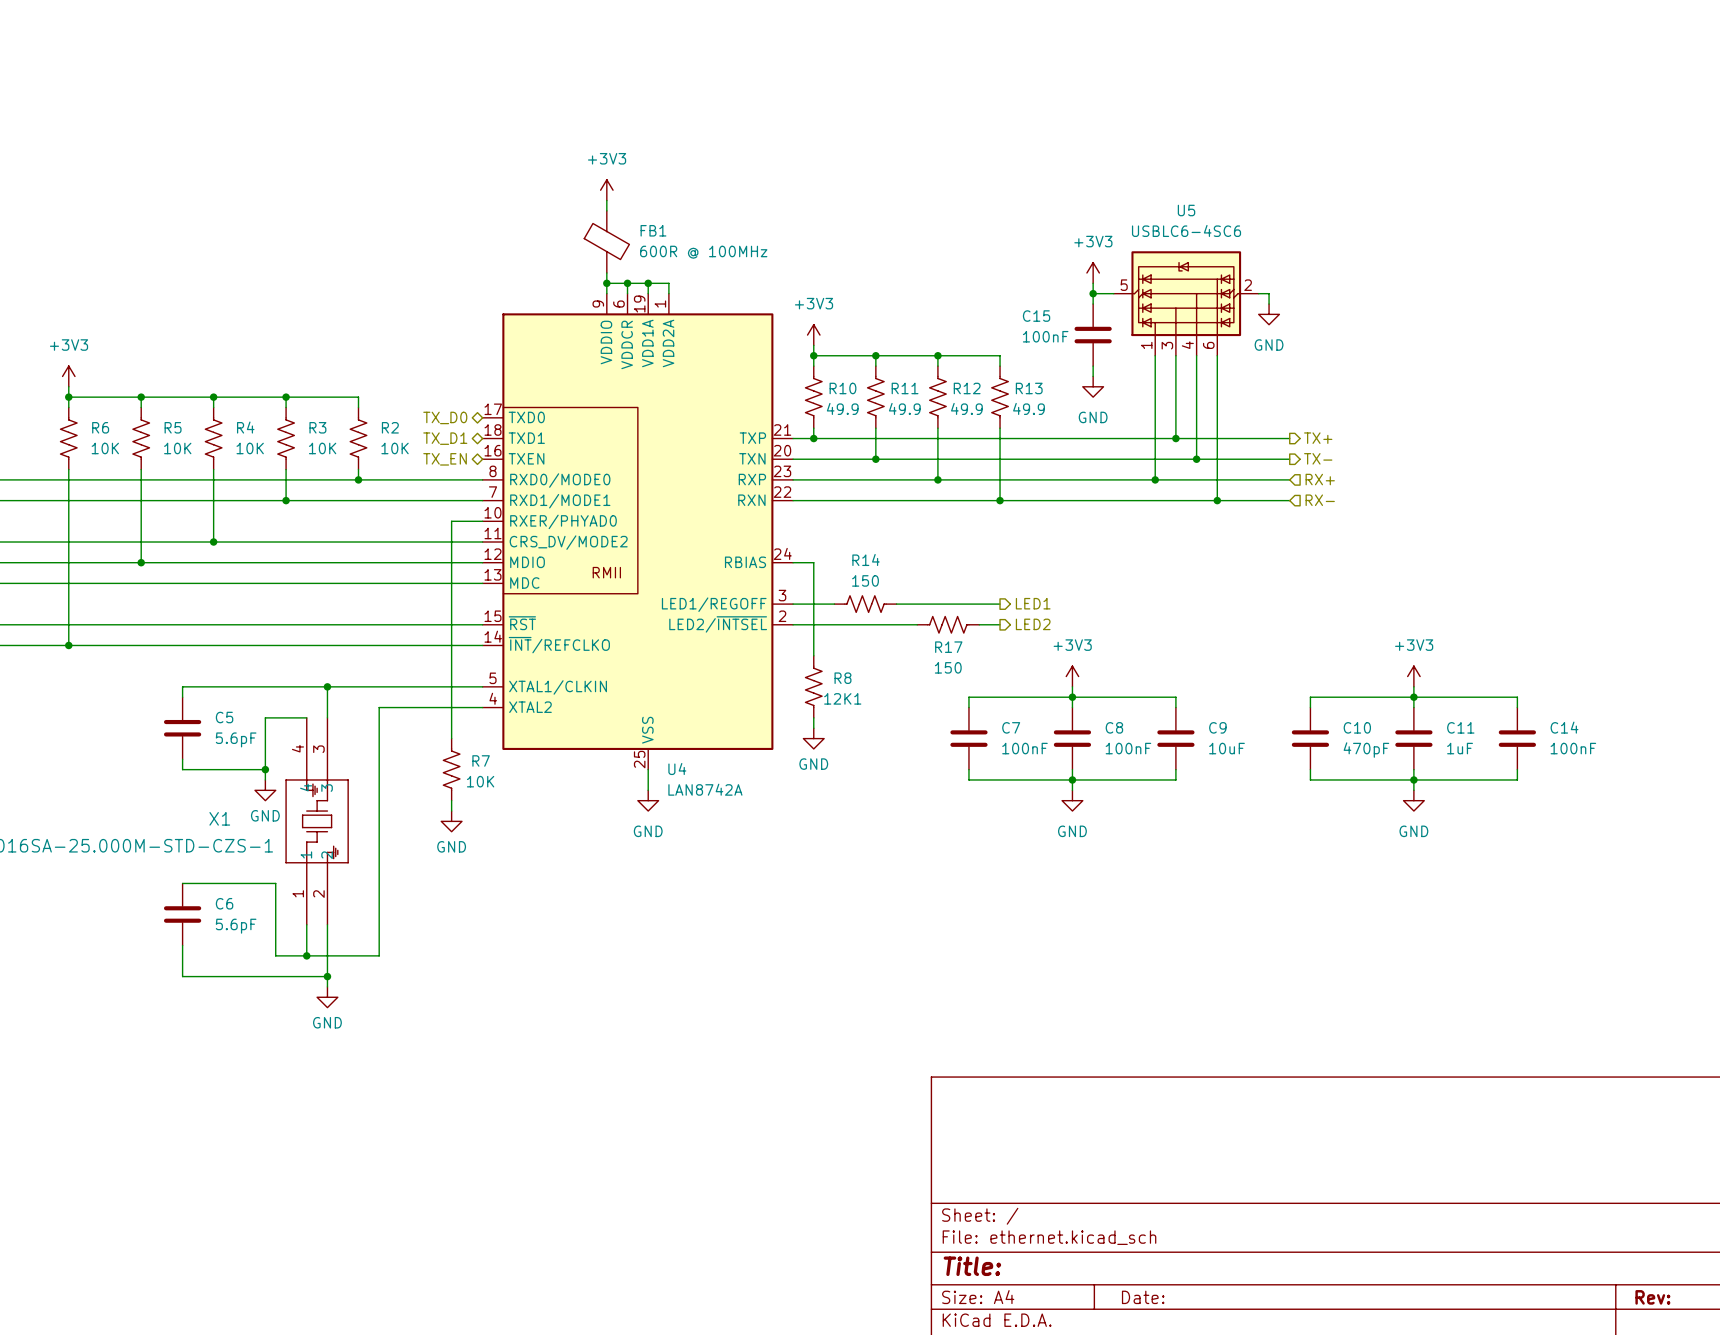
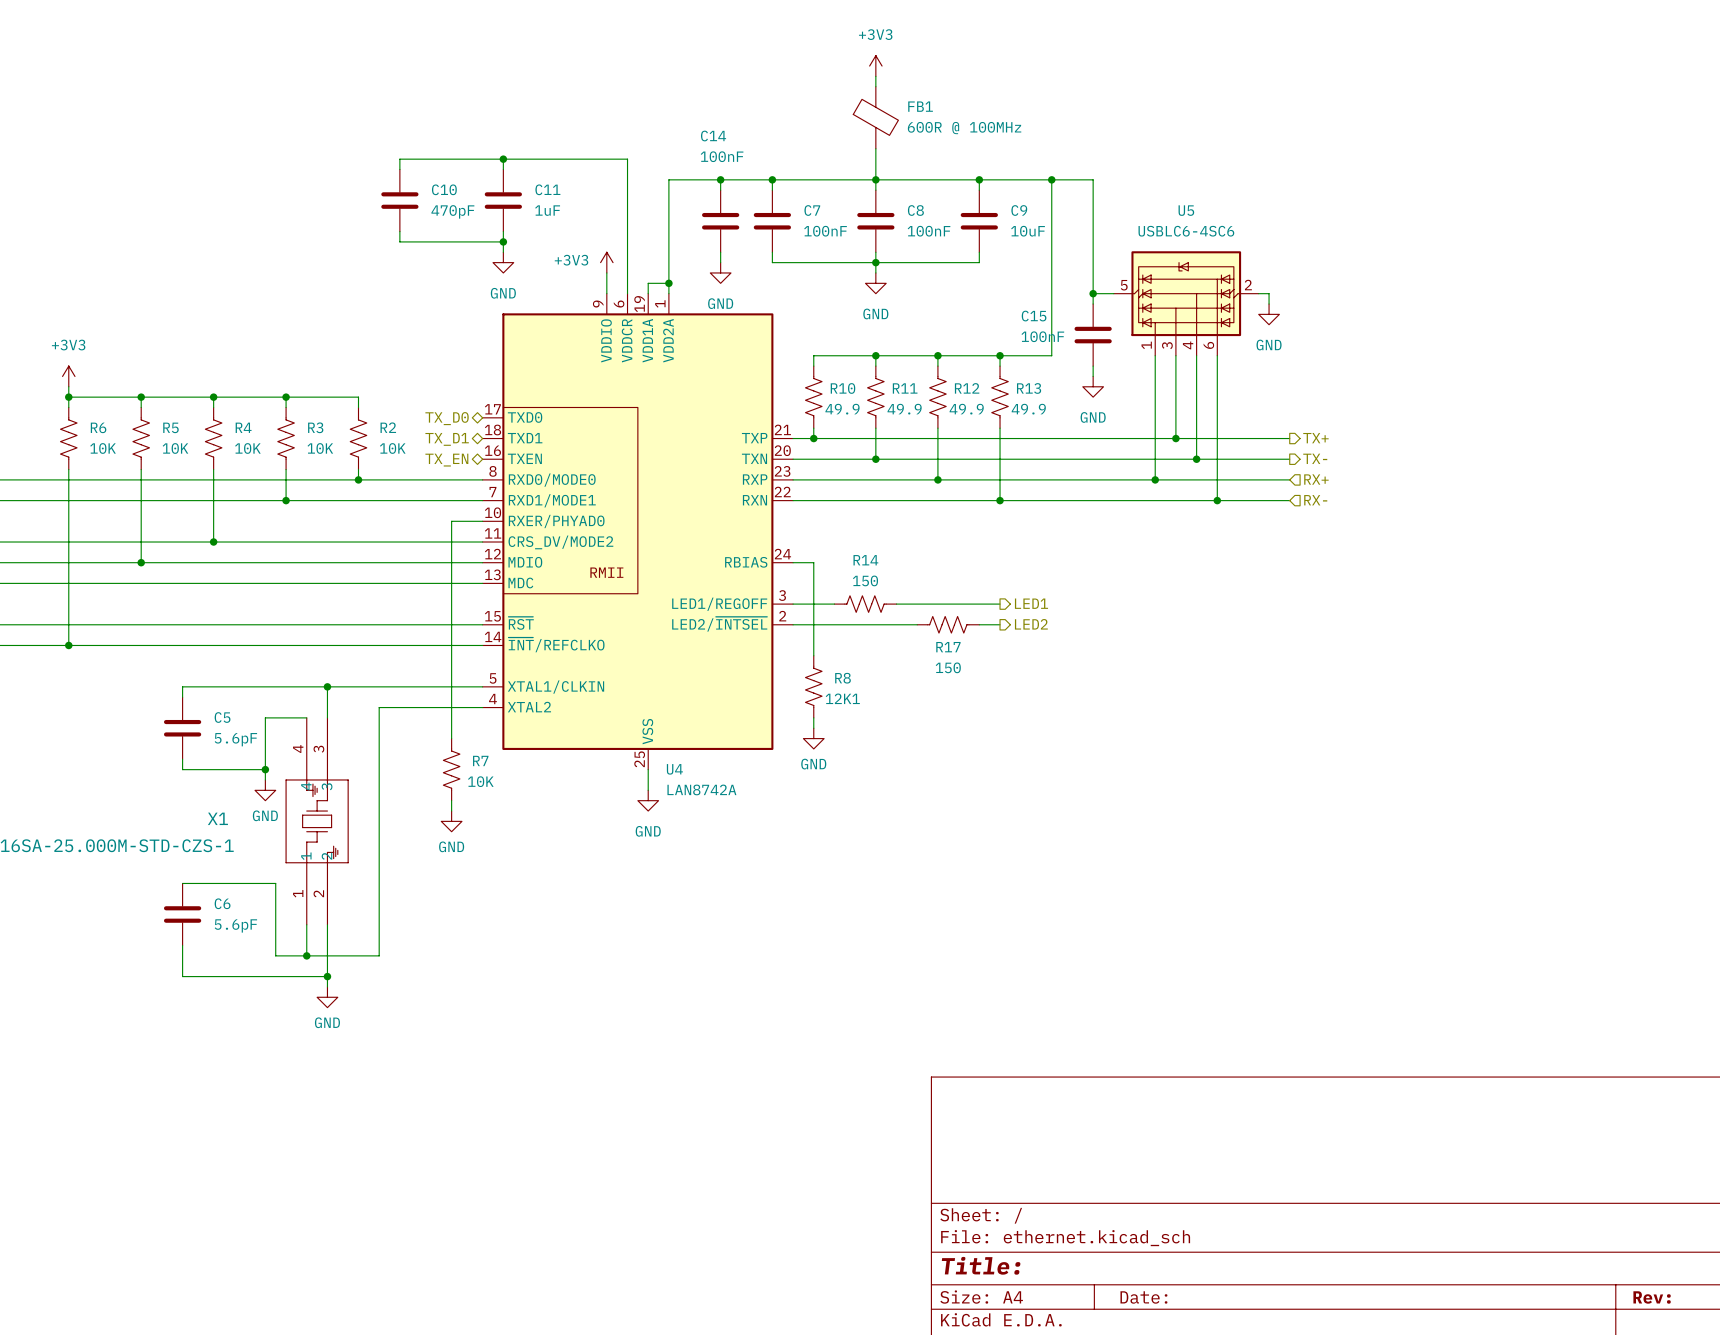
power symbol: none -> +3V3 (875, 66)
wire: none -> (875, 76) (875, 86)
wire: none -> (875, 148) (875, 190)
power symbol text position: +3V3 (607, 158) -> +3V3 (571, 260)
junction: none -> (503, 159)
wire: none -> (399, 169) (399, 159) (627, 159) (627, 283)
wire: none -> (720, 179) (720, 190)
junction: none -> (720, 179)
wire: none -> (772, 179) (772, 190)
junction: none -> (772, 179)
junction: none -> (875, 179)
wire: none -> (979, 179) (979, 190)
junction: none -> (979, 179)
wire: none -> (1051, 179) (1051, 355) (1000, 355)
junction: none -> (1051, 179)
power symbol position: +3V3 (606, 190) -> +3V3 (606, 262)
wire: (606, 200) (606, 210) -> (503, 159) (503, 169)
wire: none -> (399, 231) (399, 241) (503, 241)
wire: none -> (503, 231) (503, 252)
junction: none -> (503, 241)
FB1 position: (606, 241) -> (875, 117)
wire: none -> (772, 252) (772, 262) (979, 262) (979, 252)
wire: none -> (875, 252) (875, 272)
power symbol: none -> GND (503, 262)
junction: none -> (875, 262)
power symbol: none -> GND (720, 272)
power symbol: +3V3 (1093, 272) -> none
wire: (606, 283) (648, 283) -> none
junction: (606, 283) -> none
junction: (627, 283) -> none
junction: (648, 283) -> none
wire: none -> (668, 283) (668, 179) (1093, 179) (1093, 283)
junction: none -> (668, 283)
power symbol: none -> GND (875, 283)
power symbol: +3V3 (813, 335) -> none
wire: (813, 345) (813, 355) -> (720, 252) (720, 262)
junction: (813, 355) -> none
junction: none -> (1000, 355)
power symbol: +3V3 (1072, 676) -> none
power symbol: +3V3 (1413, 676) -> none
wire: (1072, 686) (1072, 707) -> none
wire: (1413, 686) (1413, 707) -> none
junction: (1072, 697) -> none
junction: (1413, 697) -> none
wire: (968, 707) (968, 697) (1175, 697) (1175, 707) -> none
wire: (1310, 707) (1310, 697) (1517, 697) (1517, 707) -> none
C14 name position: C14 (1564, 727) -> C14 (713, 136)
C7 position: (968, 738) -> (772, 221)
C8 position: (1072, 738) -> (875, 221)
C9 position: (1175, 738) -> (979, 221)
C10 position: (1310, 738) -> (399, 200)
C11 position: (1413, 738) -> (503, 200)
C14 position: (1517, 738) -> (720, 221)
C14 value position: 100nF (1573, 748) -> 100nF (722, 156)
wire: (968, 769) (968, 779) (1175, 779) (1175, 769) -> none
wire: (1072, 769) (1072, 790) -> none
wire: (1310, 769) (1310, 779) (1517, 779) (1517, 769) -> none
wire: (1413, 769) (1413, 790) -> none
junction: (1072, 779) -> none
junction: (1413, 779) -> none
power symbol: GND (1072, 800) -> none
power symbol: GND (1413, 800) -> none

